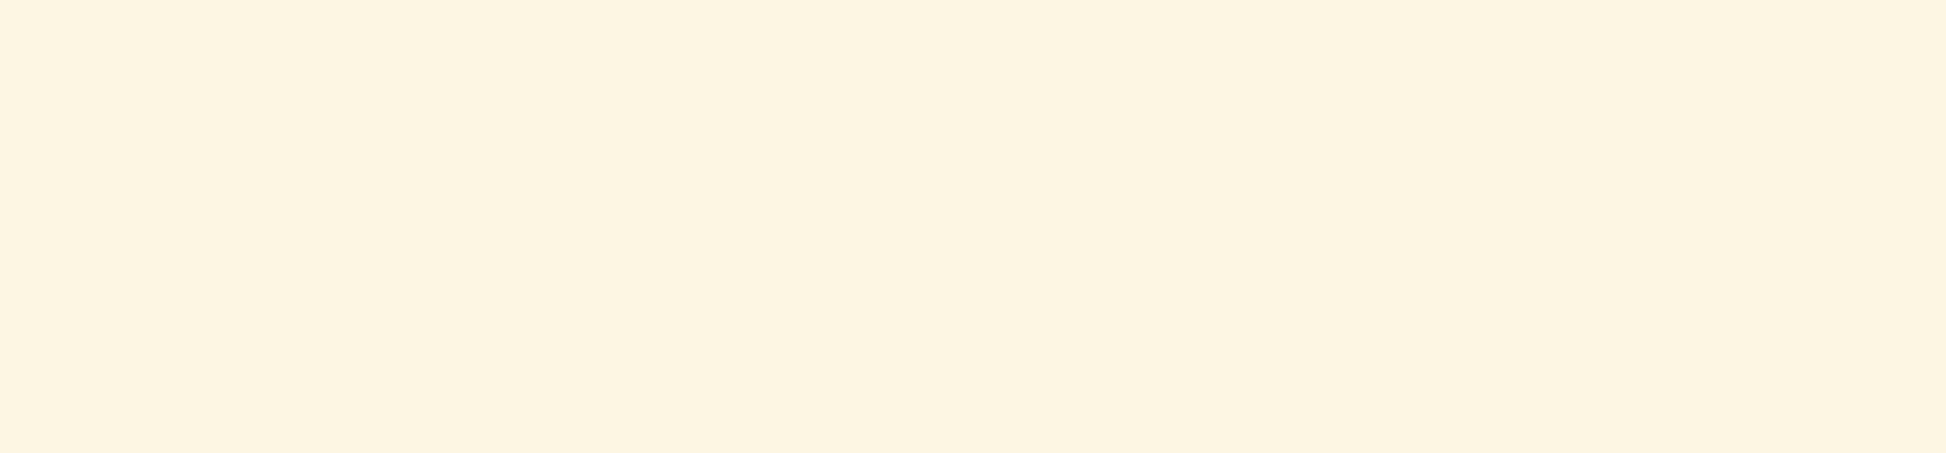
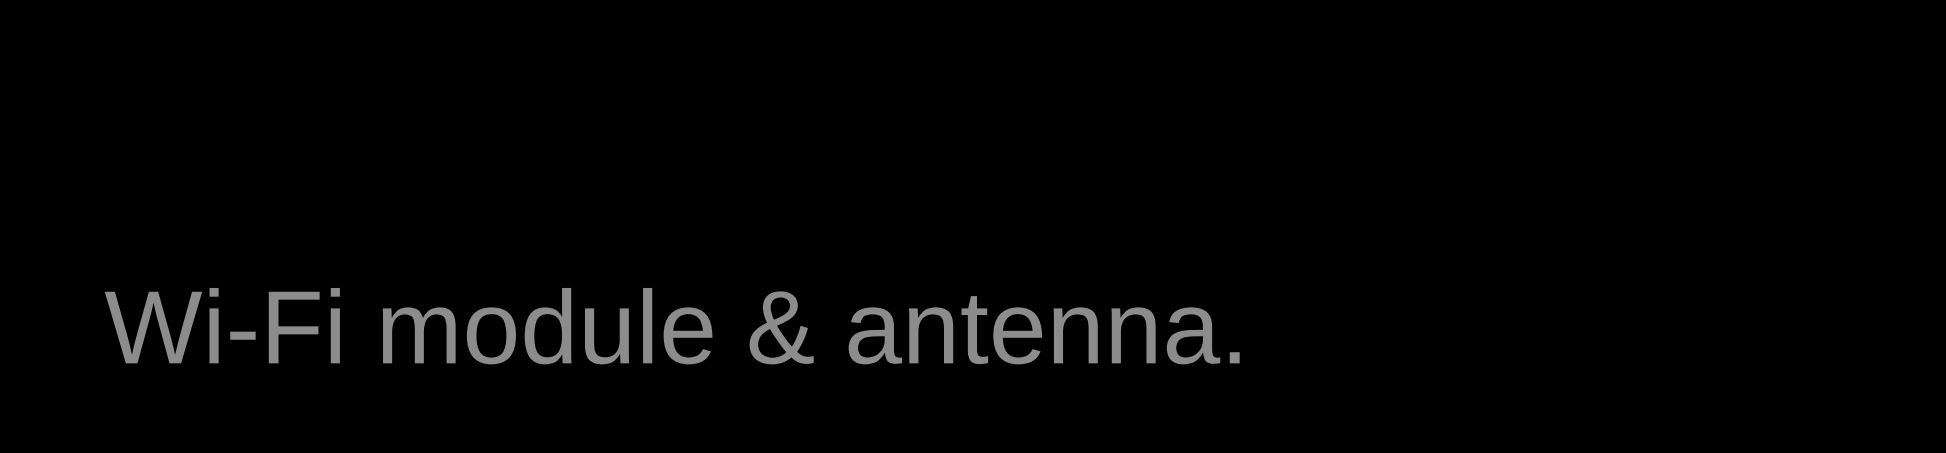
text: none -> Wi-Fi module & antenna. (672, 326)

